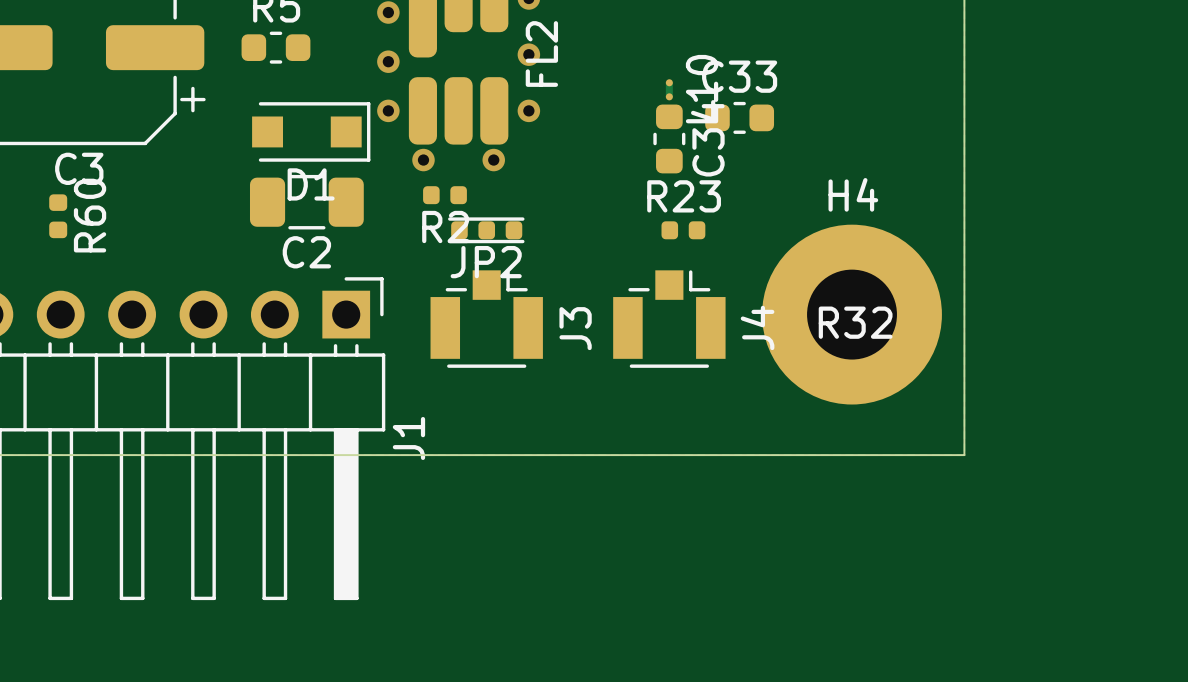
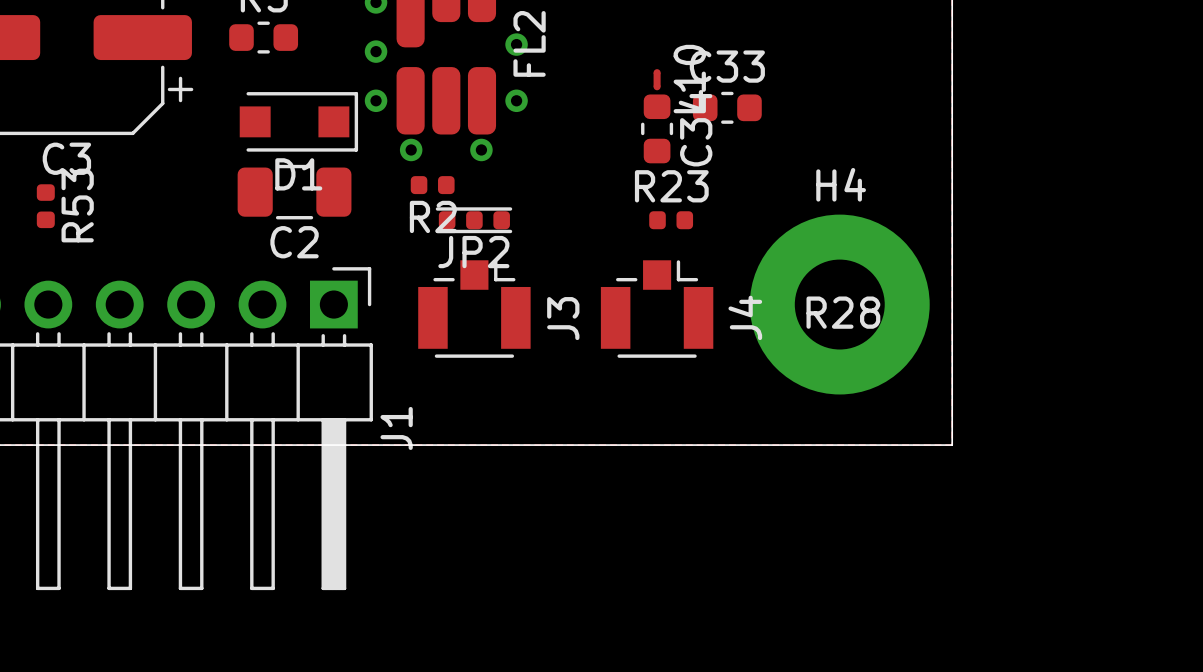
R60 name: R60 (90, 215) -> R53 (77, 205)
R32 name: R32 (855, 322) -> R28 (843, 312)

